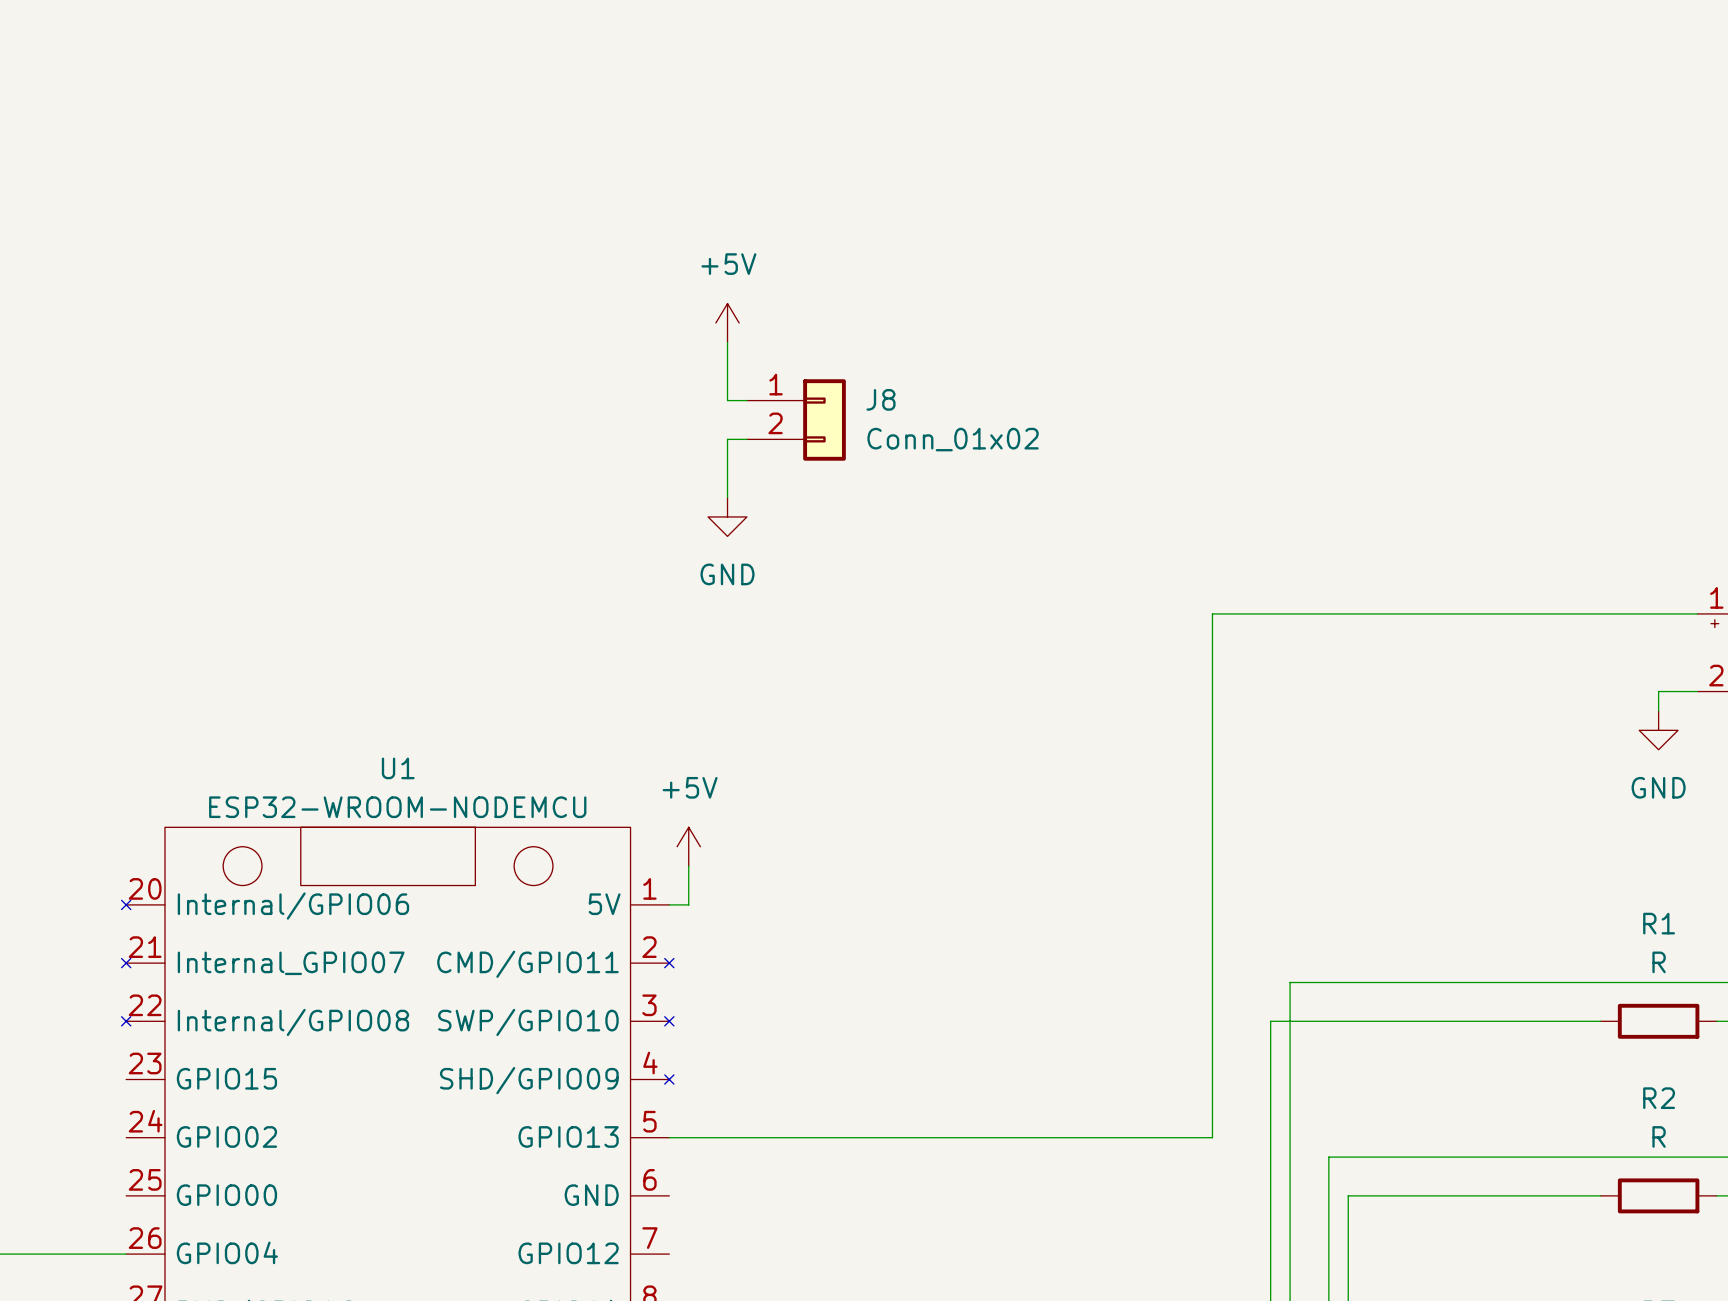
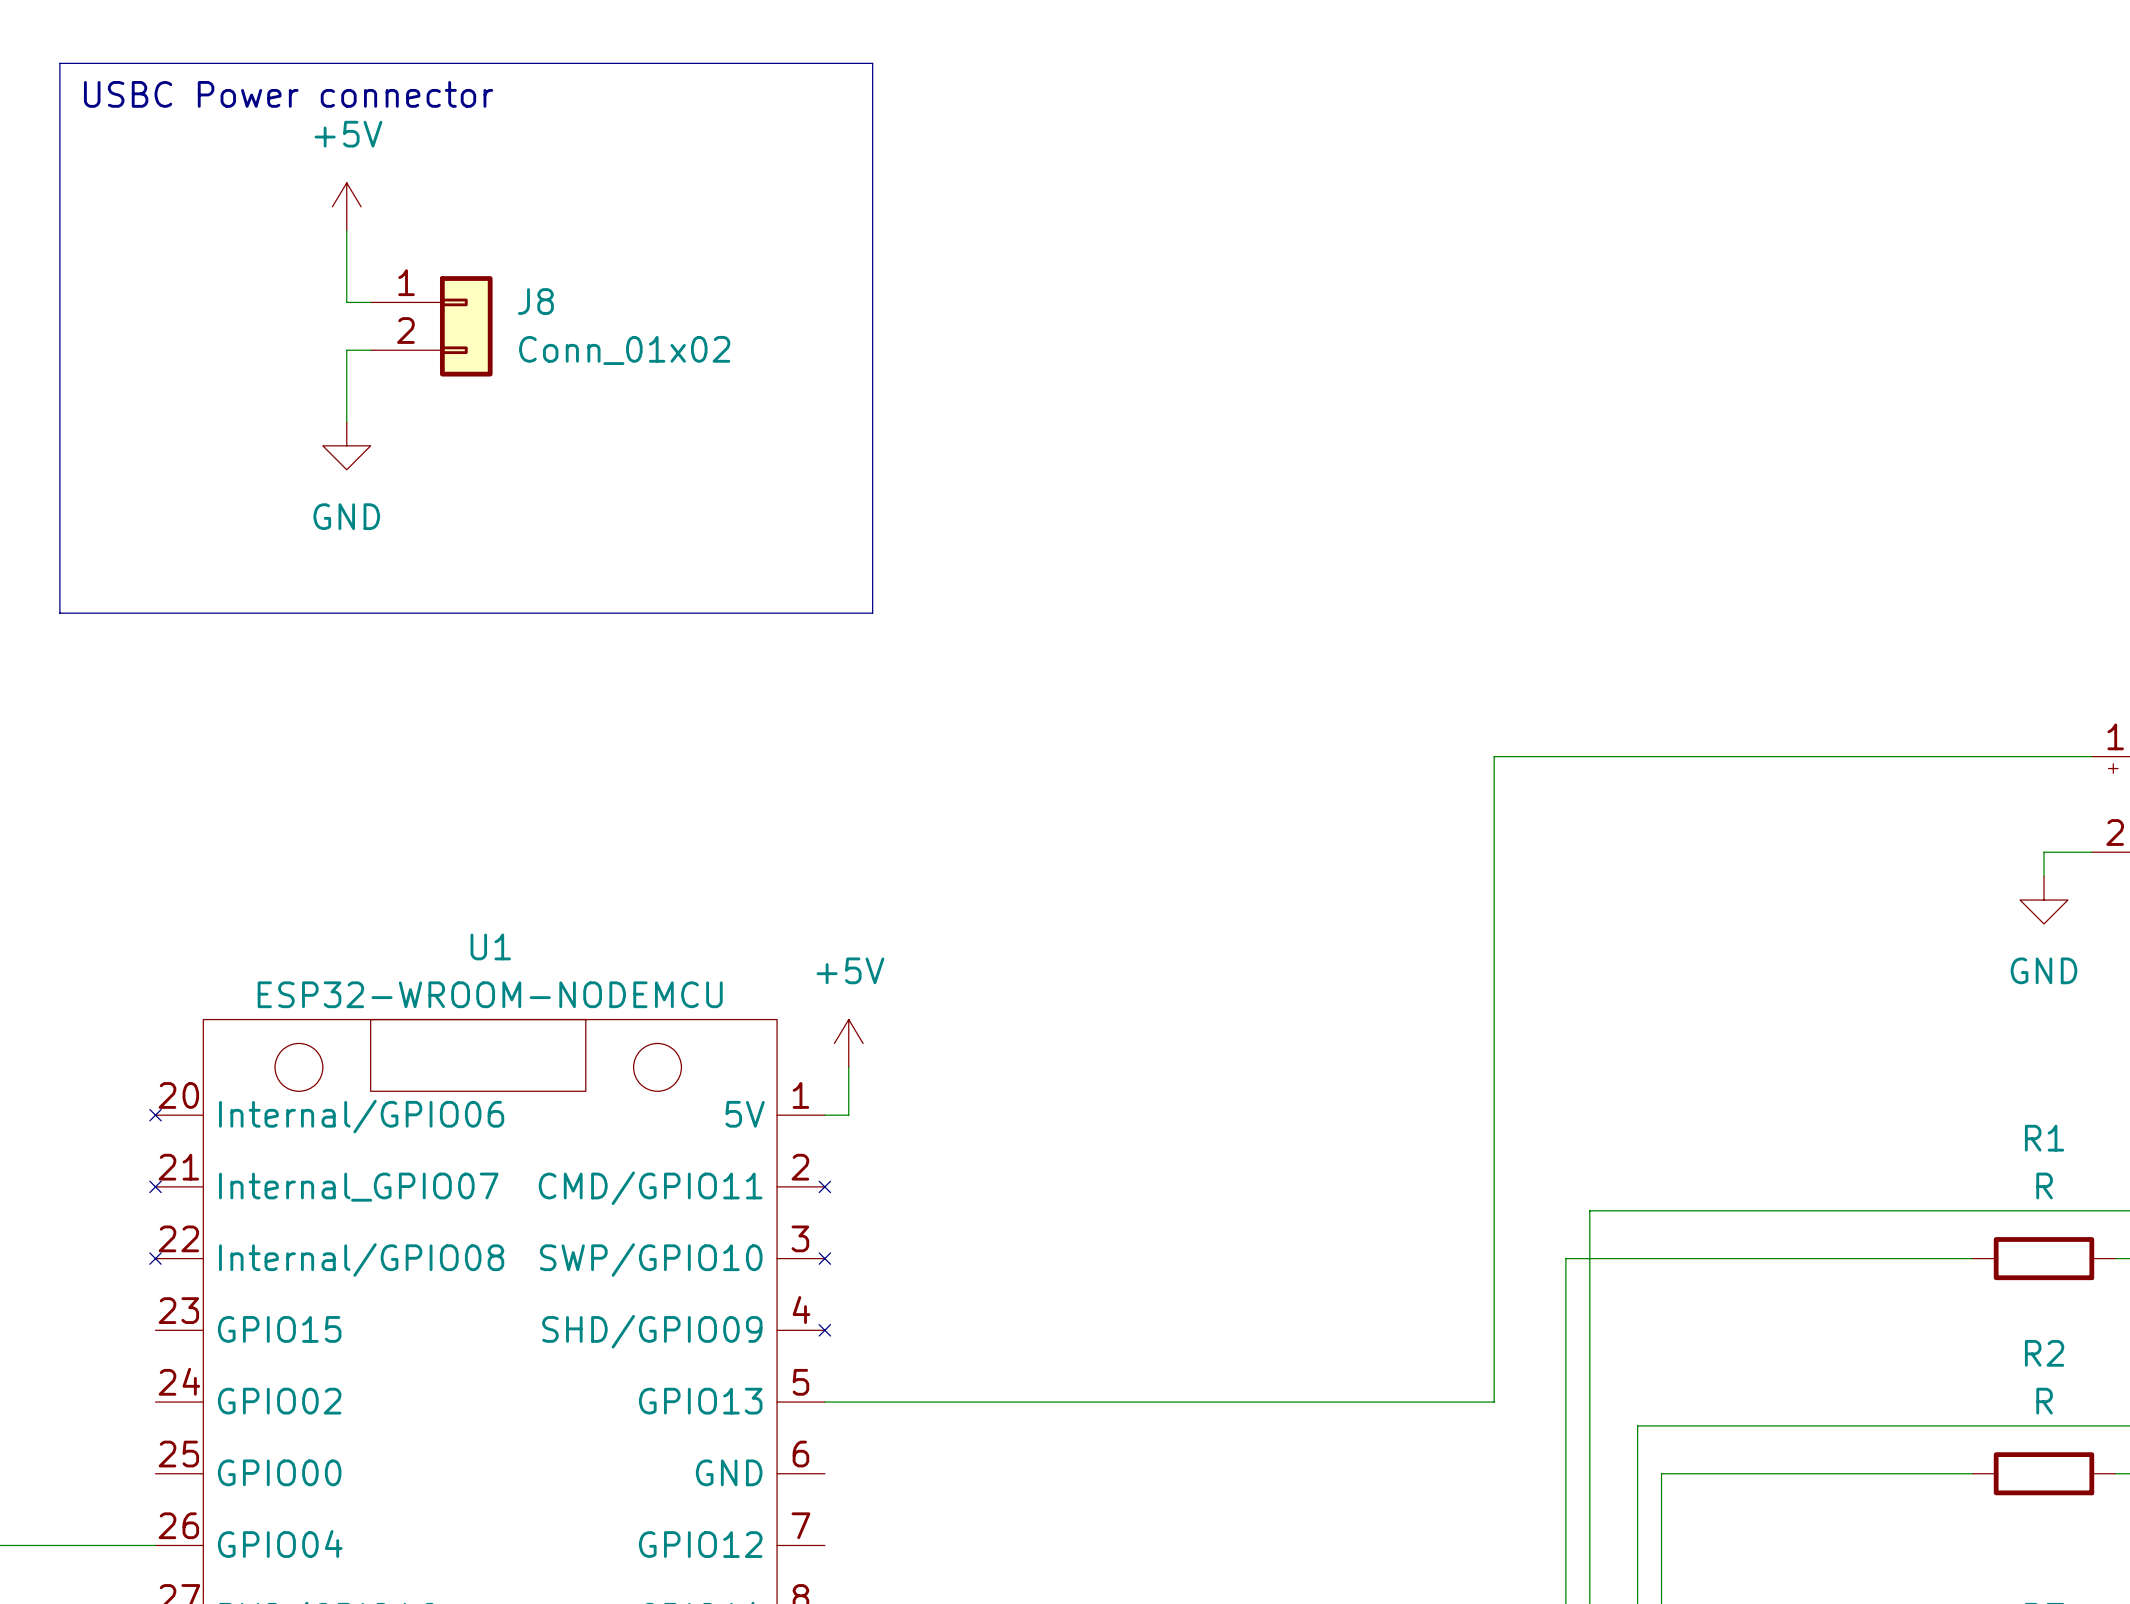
line: none -> (59, 63) (872, 63) (872, 613) (59, 613) (59, 63)
text: none -> USBC Power connector (288, 94)
power symbol: none -> +5V (346, 206)
wire: none -> (346, 230) (346, 302) (370, 302)
wire: none -> (370, 350) (346, 350) (346, 421)
power symbol: +5V (727, 322) -> none
wire: (727, 342) (727, 400) (746, 400) -> none
power symbol: none -> GND (346, 445)
J8 position: (796, 419) -> (431, 326)
wire: (746, 439) (727, 439) (727, 497) -> none
power symbol: GND (727, 516) -> none

